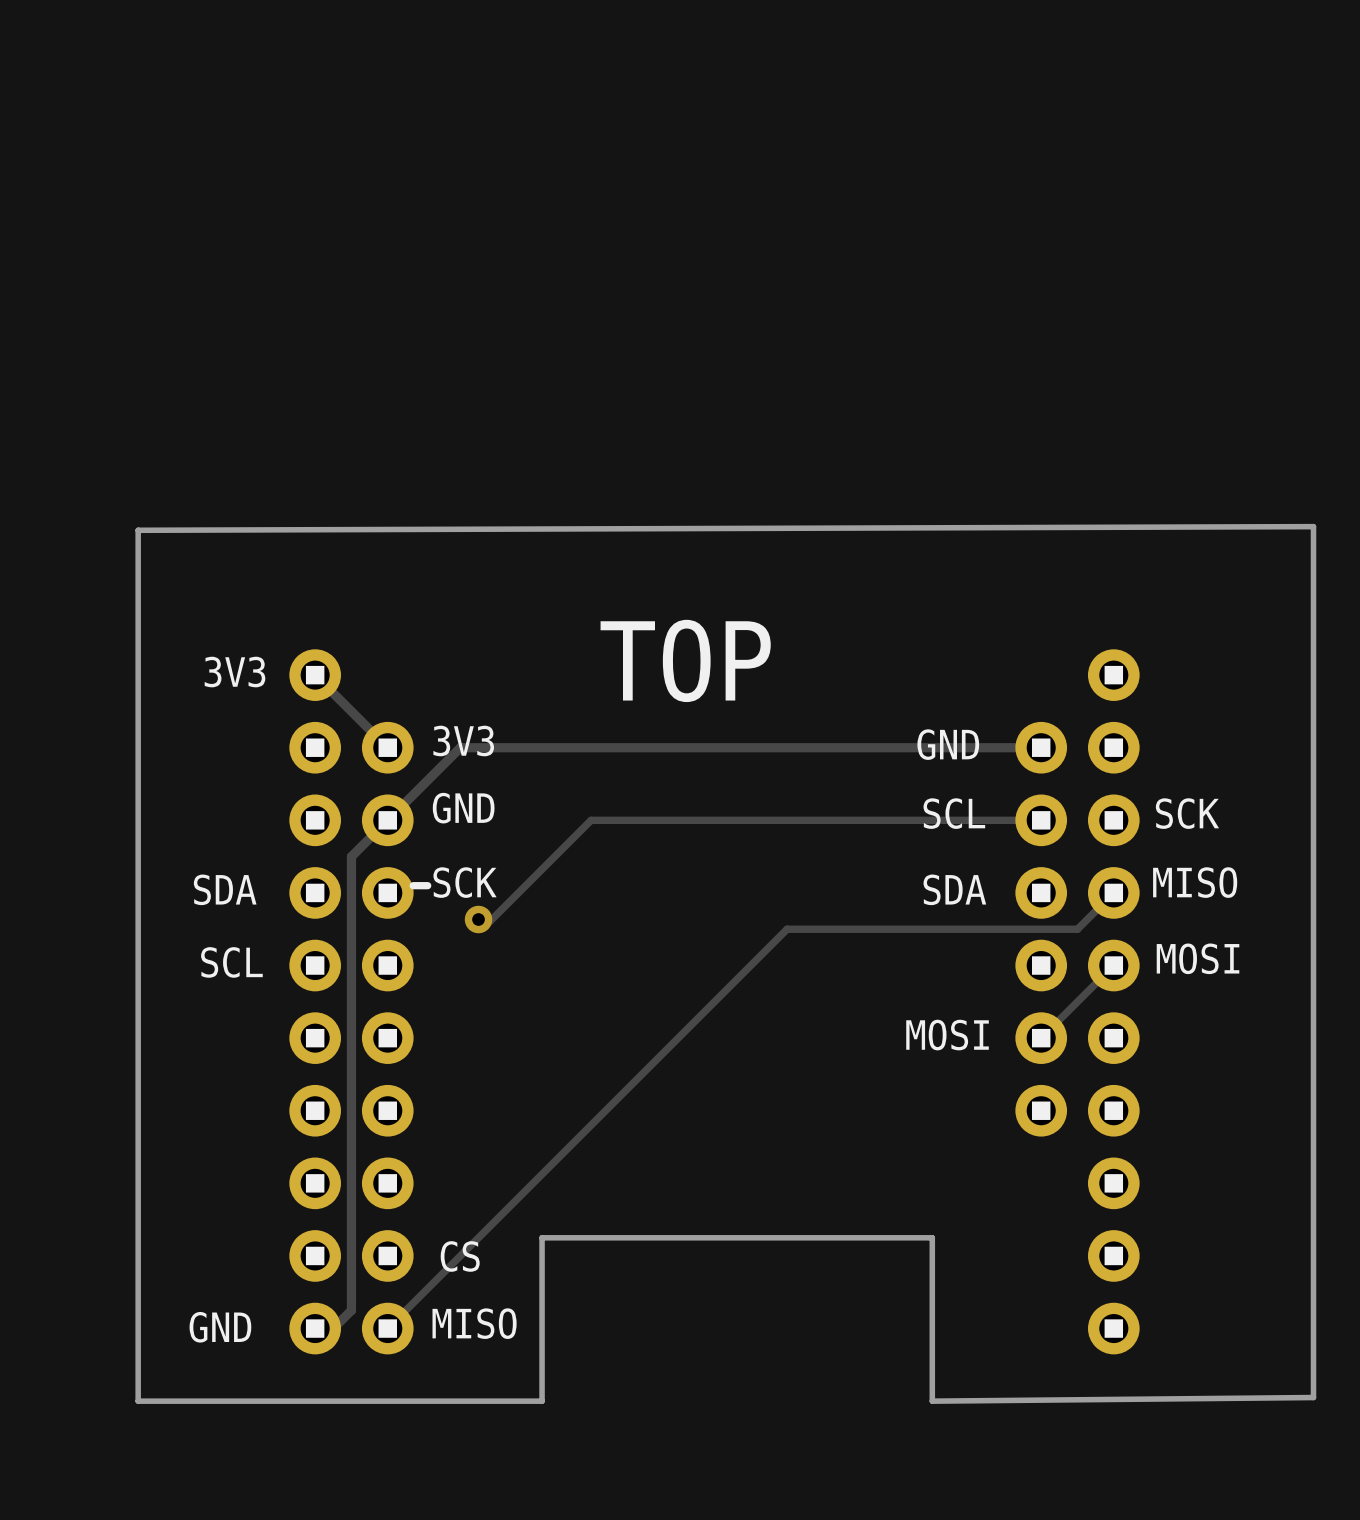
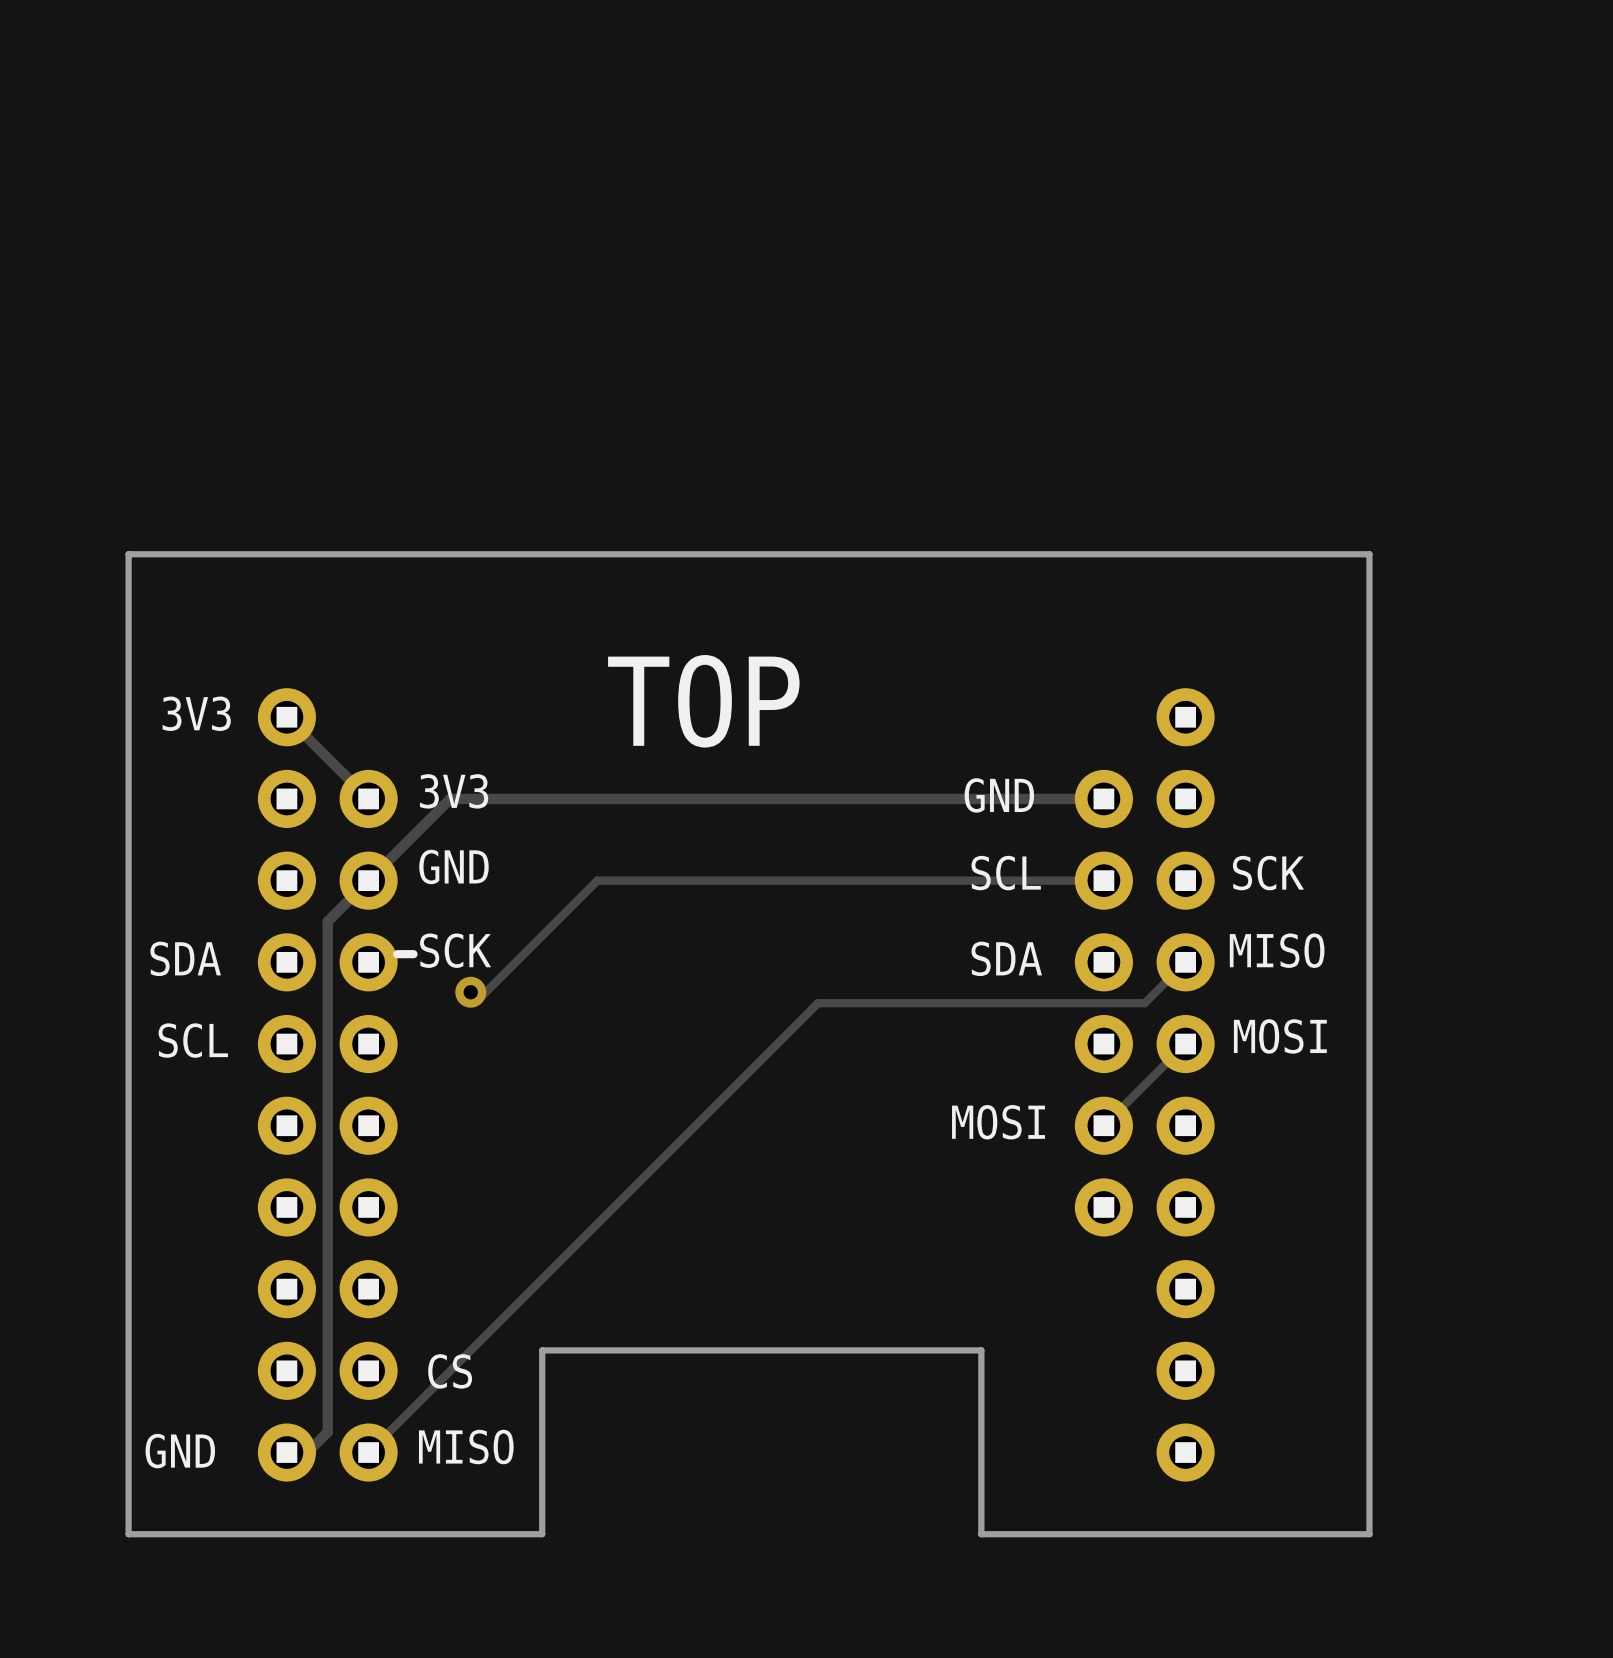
board edge: (174, 1401) (138, 1401) (138, 530) (1313, 526) (1313, 1397) (932, 1401) -> (128, 1534) (128, 554) (1369, 554) (1369, 1534) (981, 1534)

